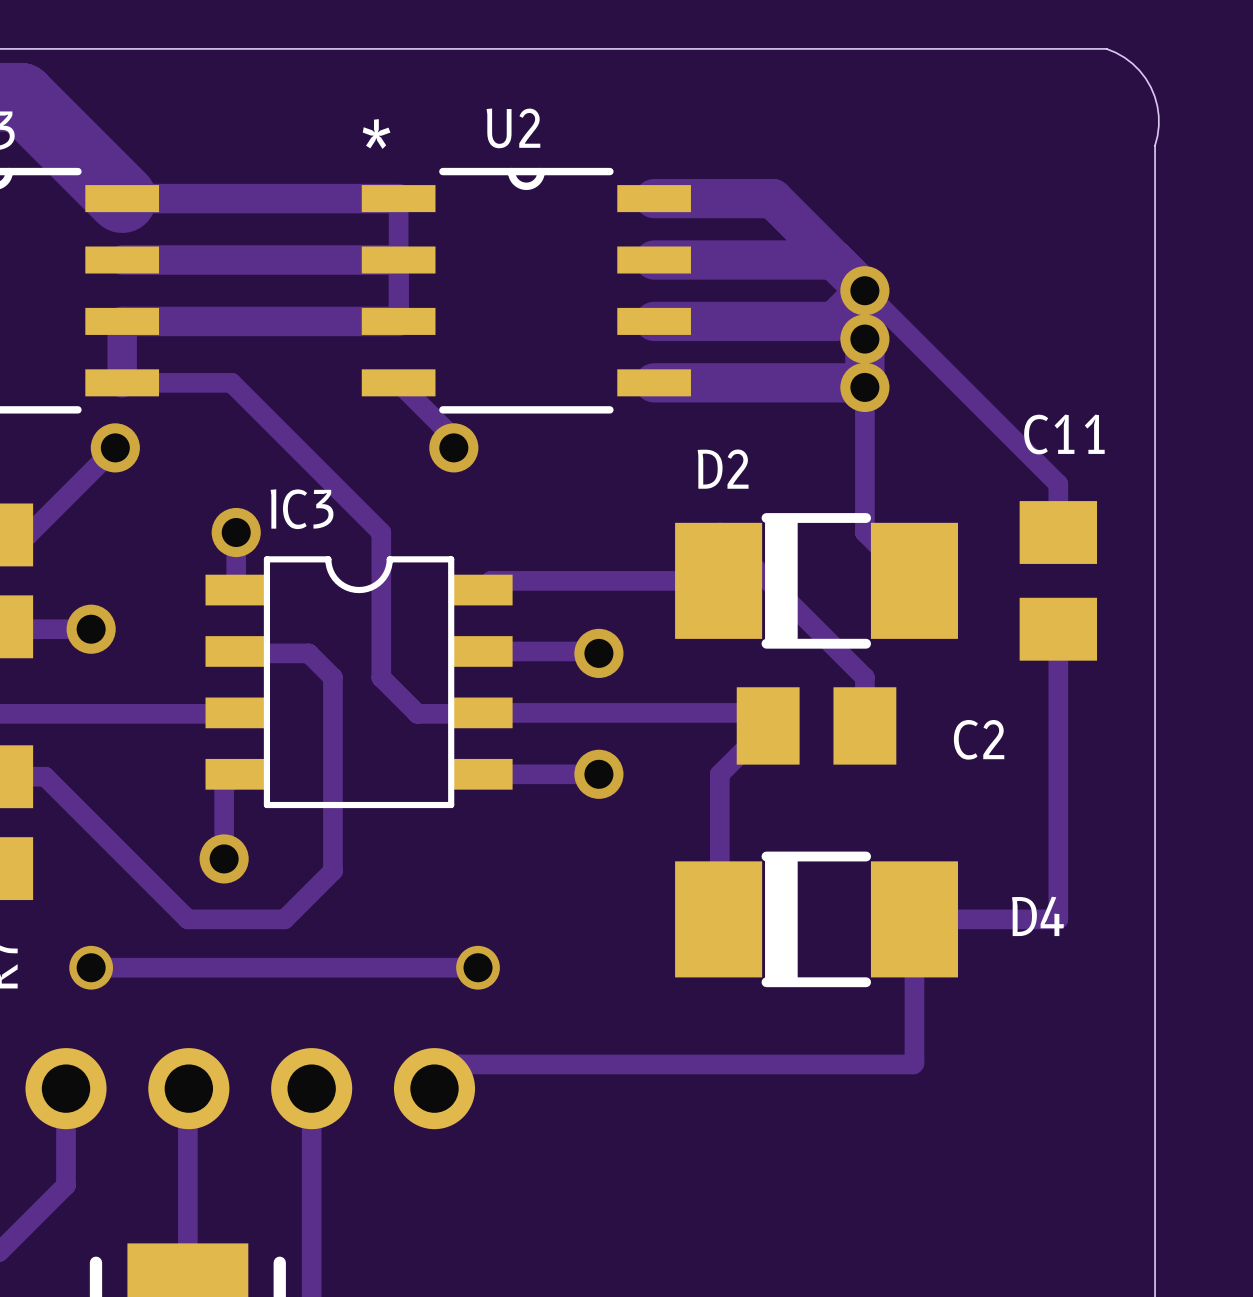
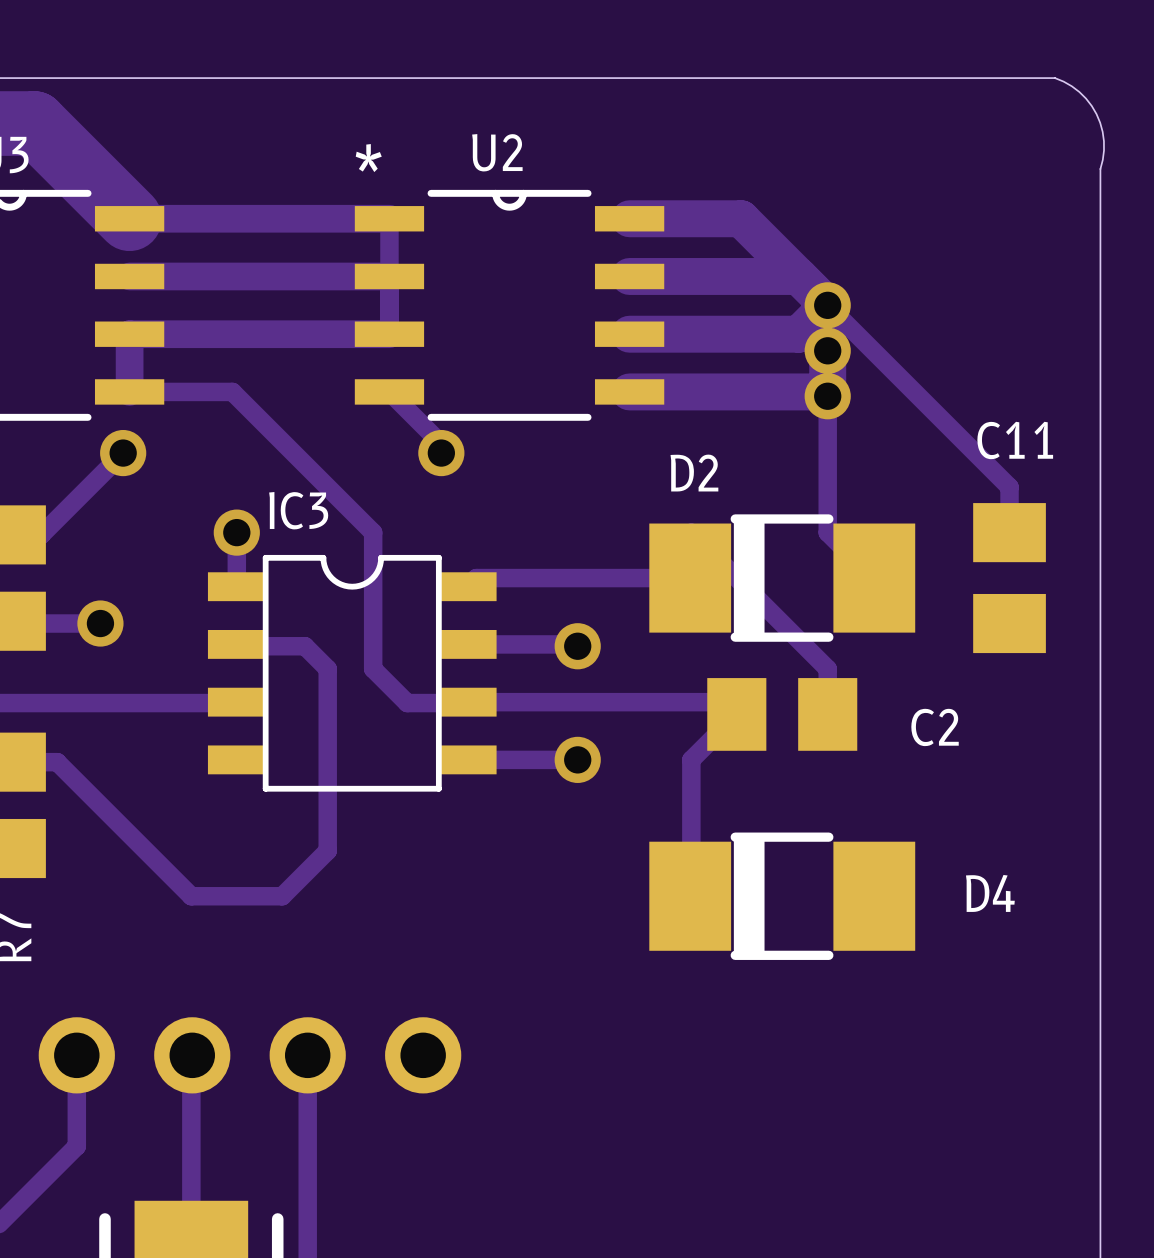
track: (1058, 629) (1058, 919) (914, 919) (913, 1064) (458, 1064) (434, 1088) -> none
track: (236, 774) (224, 786) (224, 858) -> none
via: (224, 858) -> none
via: (91, 967) -> none
track: (478, 967) (91, 967) -> none
via: (478, 967) -> none

